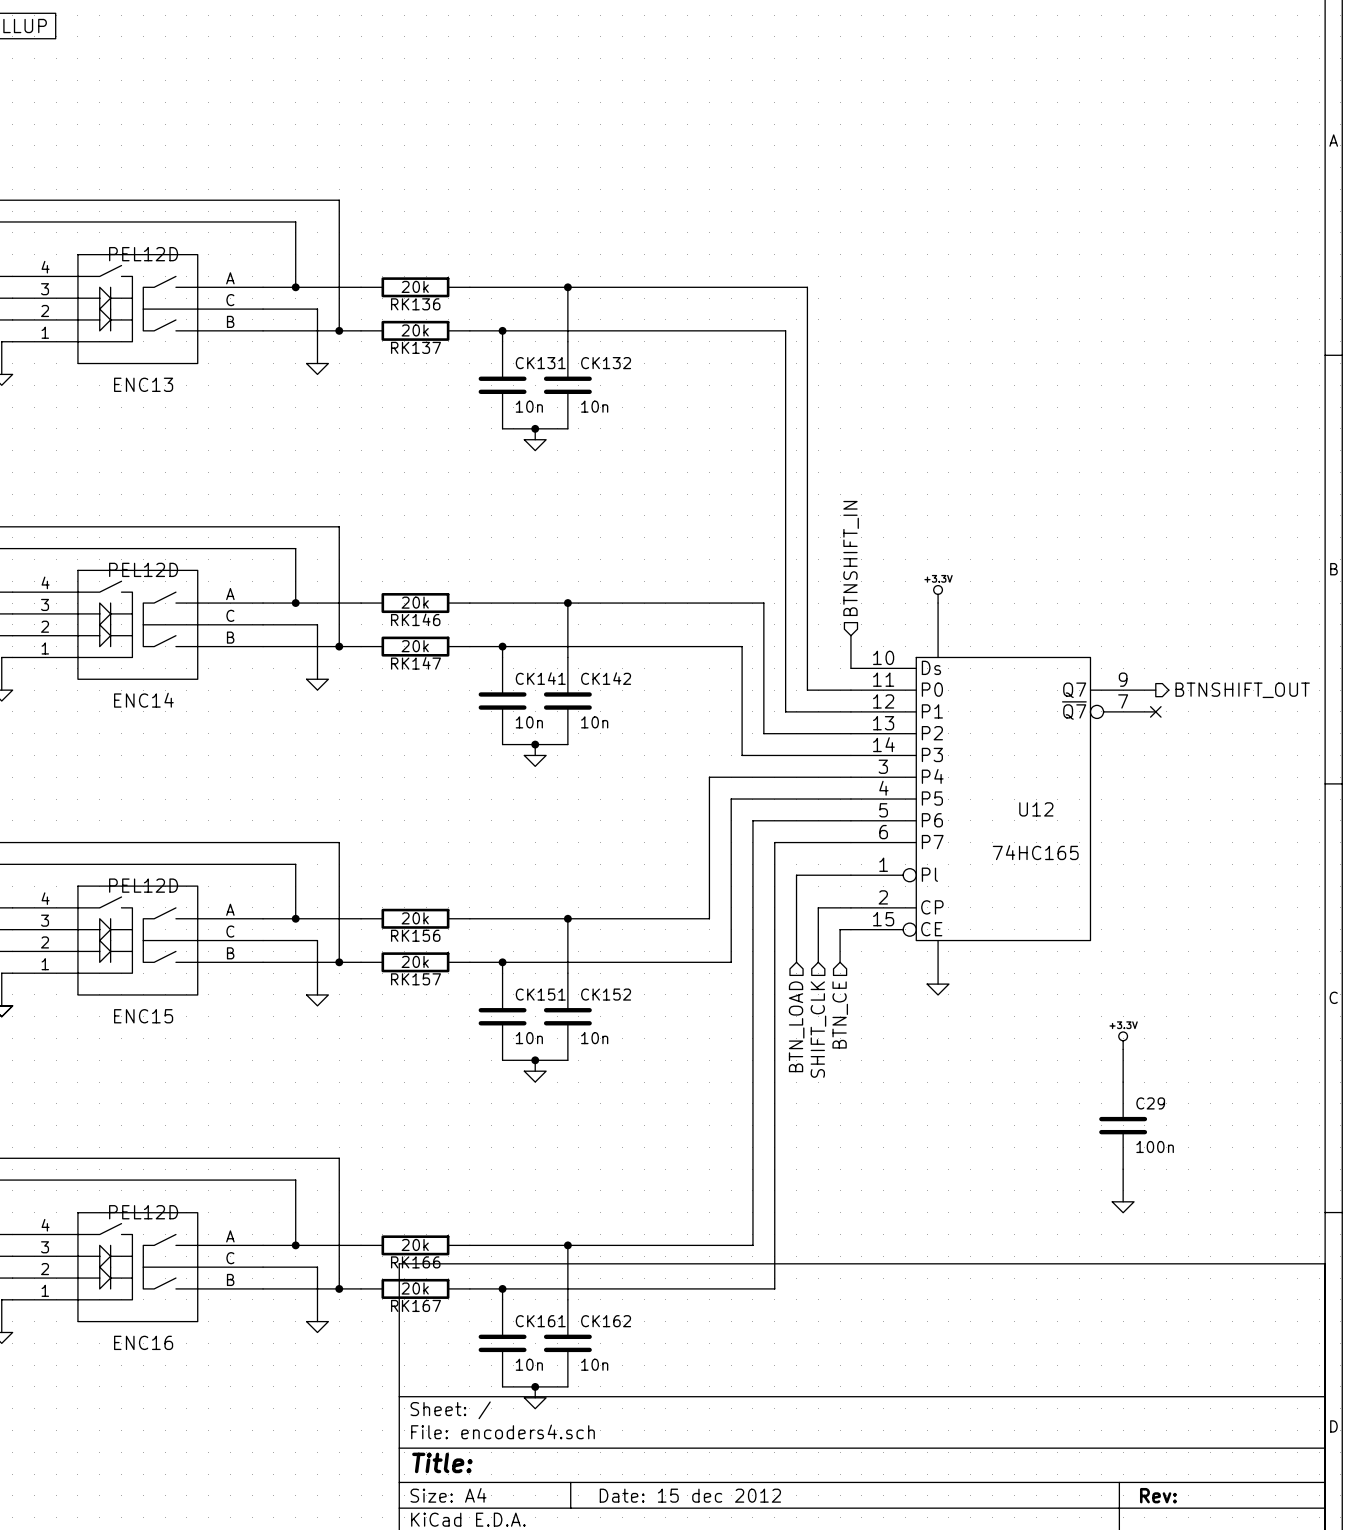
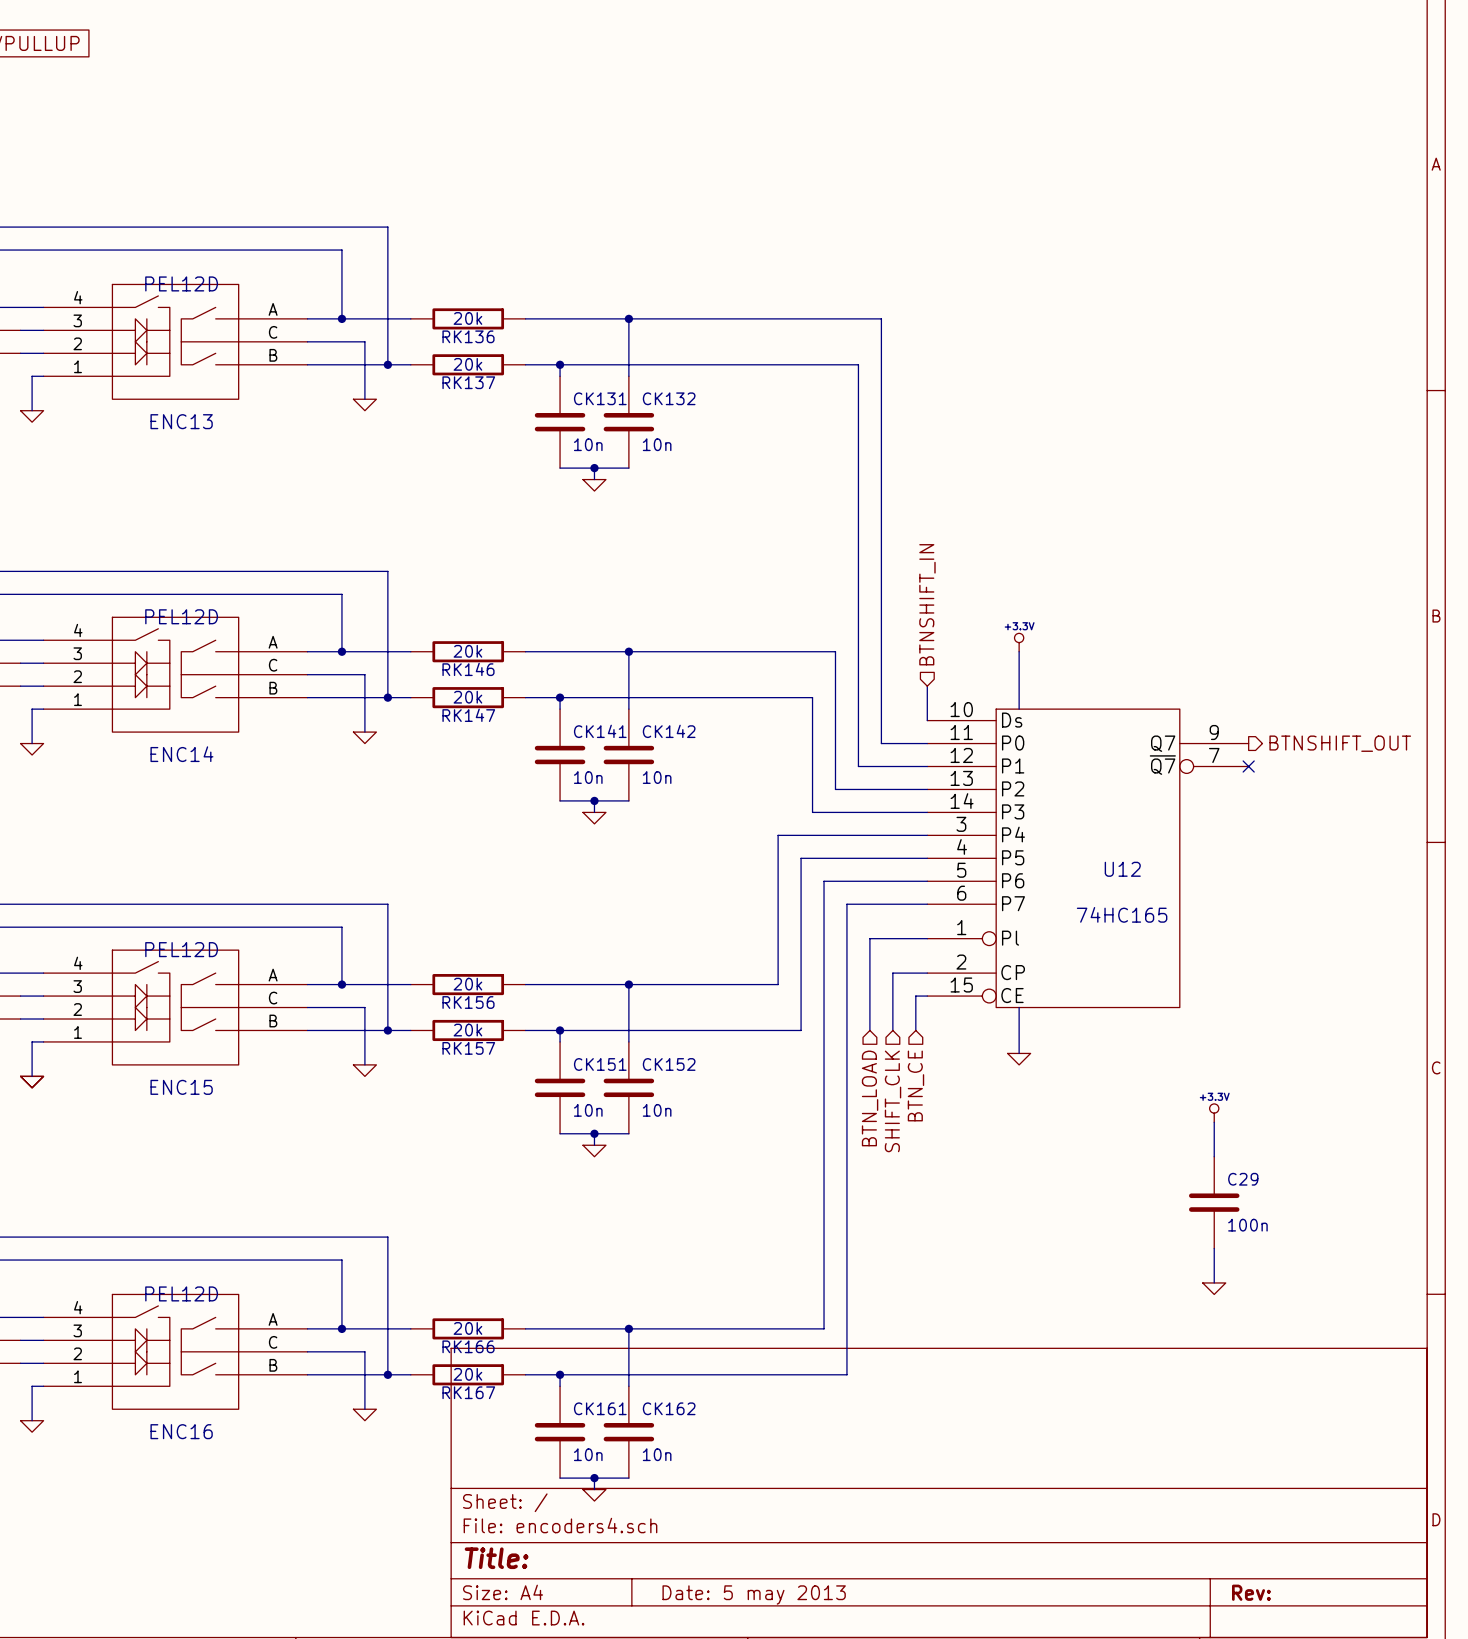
title block: Date: 15 dec 2012 (690, 1495) -> Date: 5 may 2013 (754, 1594)

